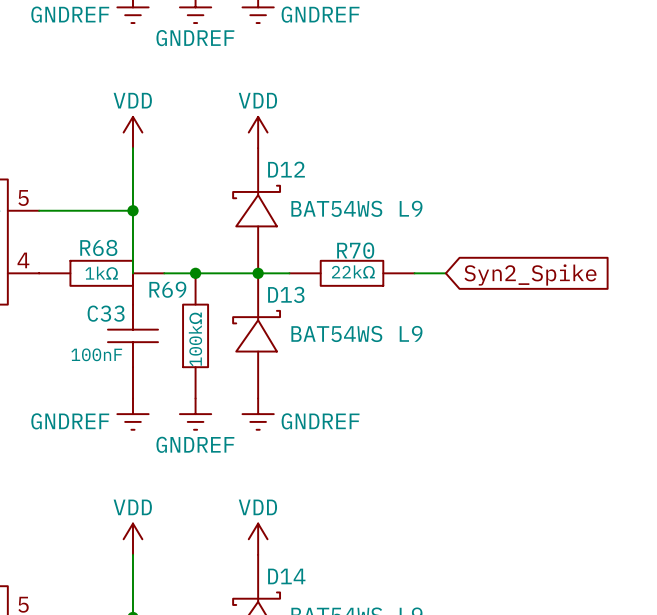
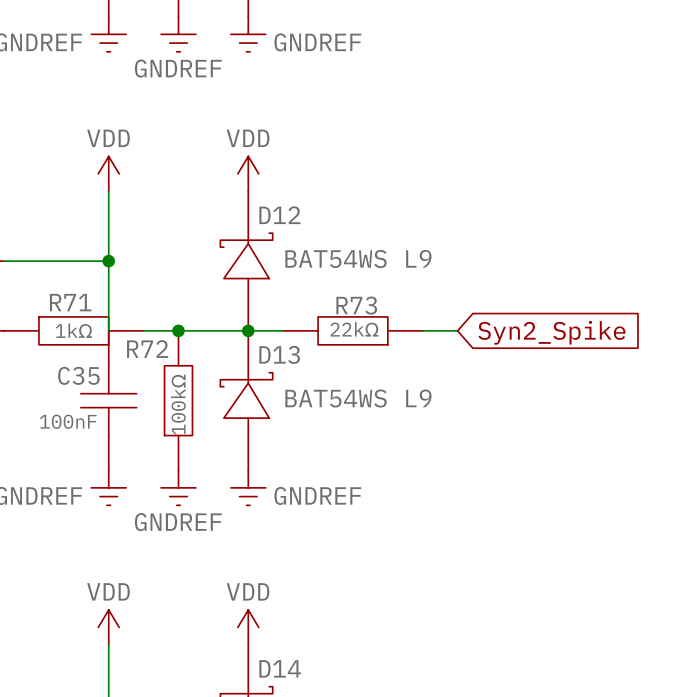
R68 name: R68 (98, 247) -> R71 (70, 302)
R70 name: R70 (355, 250) -> R73 (356, 305)
R69 name: R69 (167, 289) -> R72 (147, 349)
C33 name: C33 (106, 313) -> C35 (78, 375)

